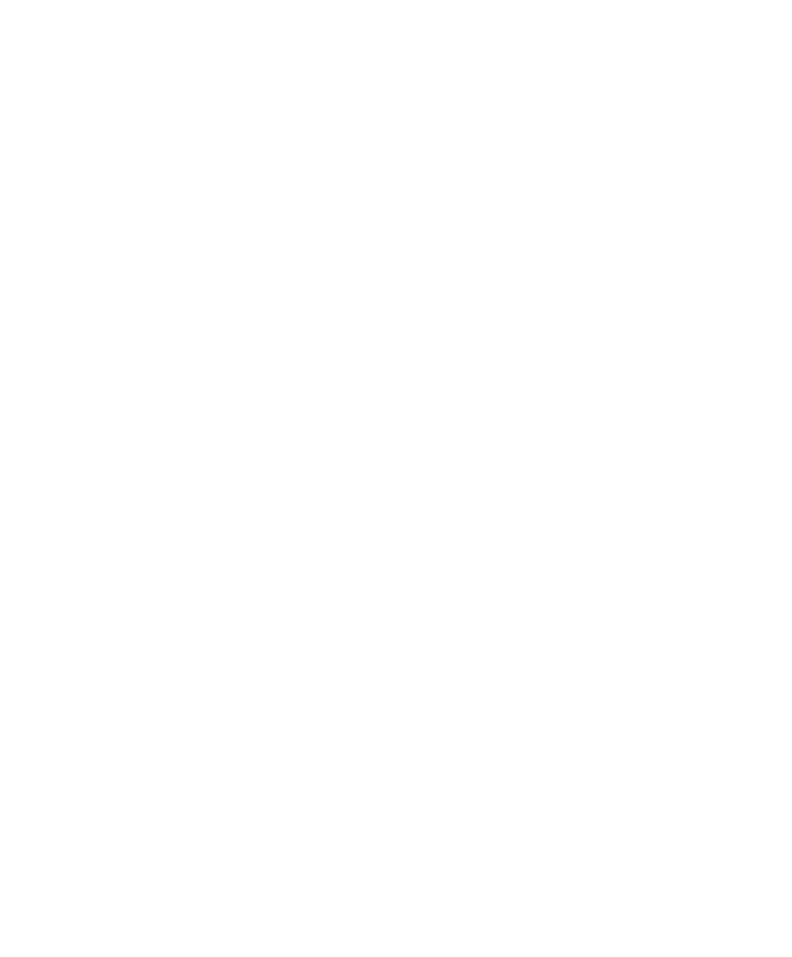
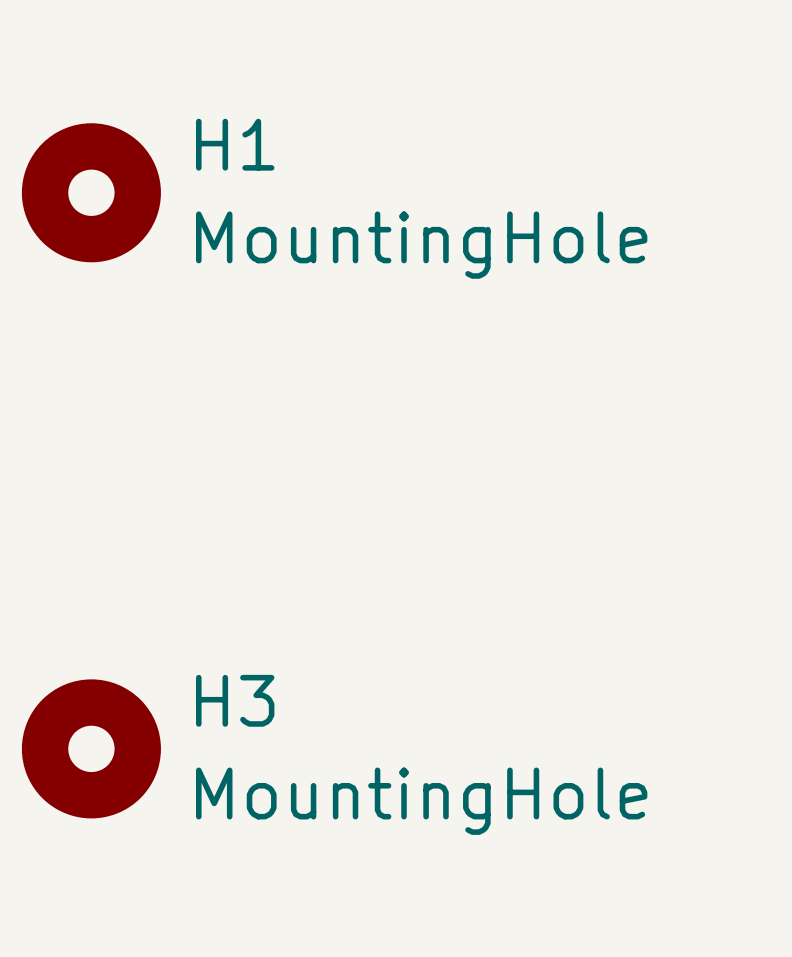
H1: none -> MountingHole (91, 192)
H3: none -> MountingHole (91, 748)

